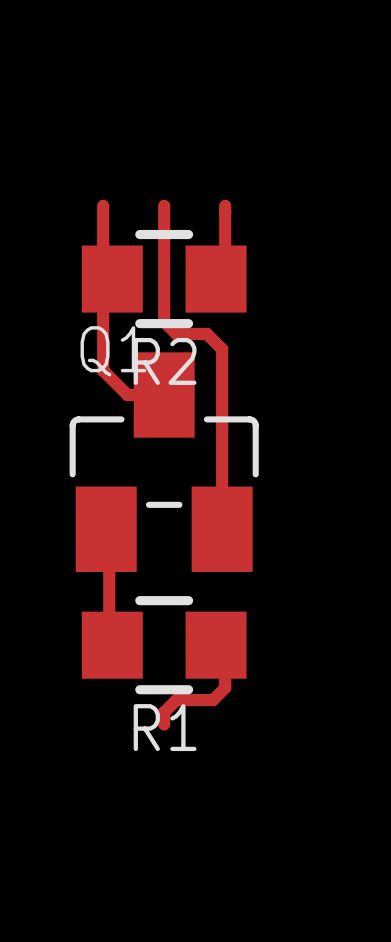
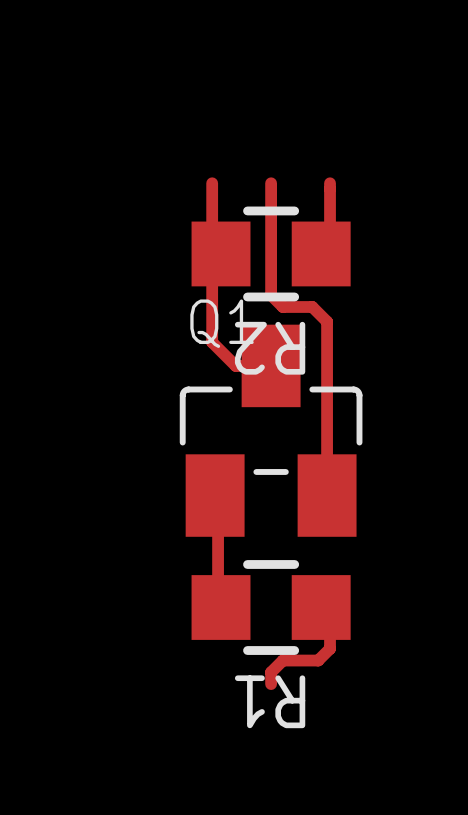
R2 name rotation: 0° (165, 361) -> 180° (270, 348)
R1 name rotation: 0° (165, 727) -> 180° (270, 701)

